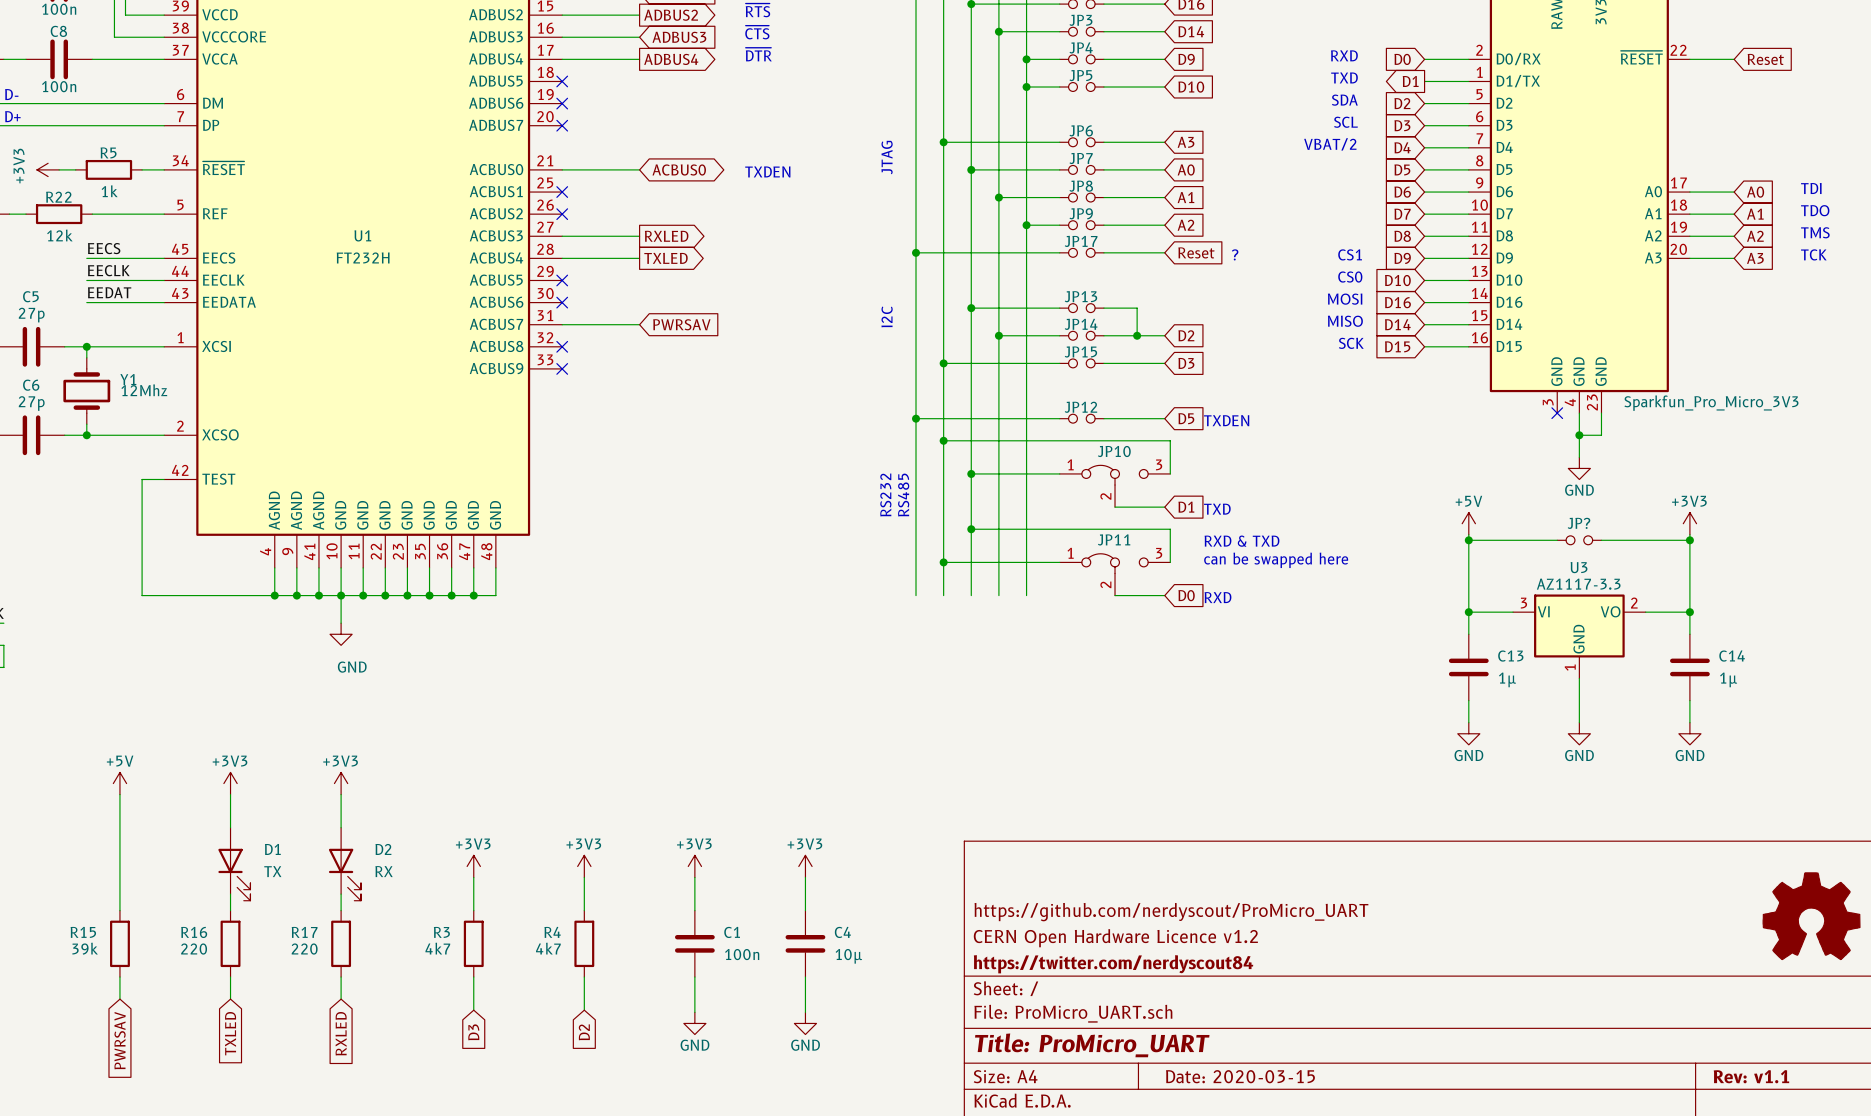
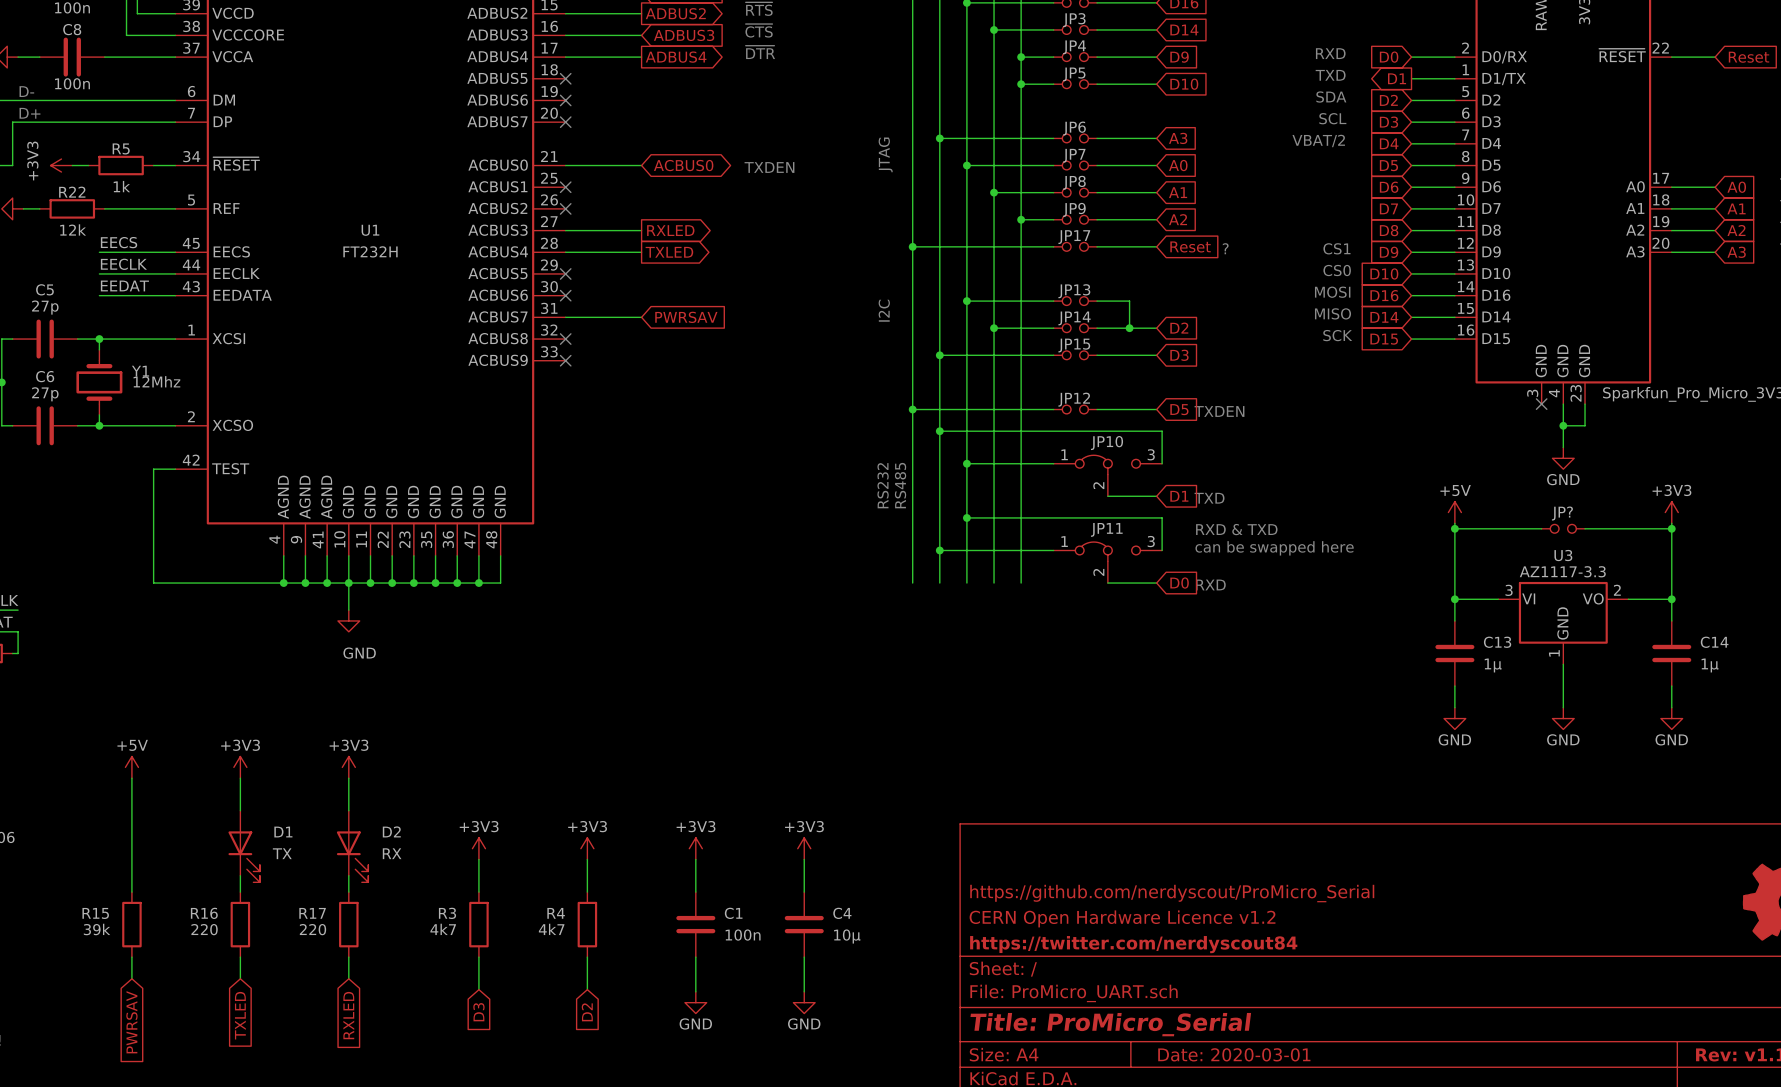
title block: https://github.com/nerdyscout/ProMicro_UART (1171, 912) -> https://github.com/nerdyscout/ProMicro_Serial (1172, 893)
title block: Title: ProMicro_UART (1092, 1045) -> Title: ProMicro_Serial (1110, 1024)
title block: Date: 2020-03-15 (1240, 1076) -> Date: 2020-03-01 (1234, 1054)

